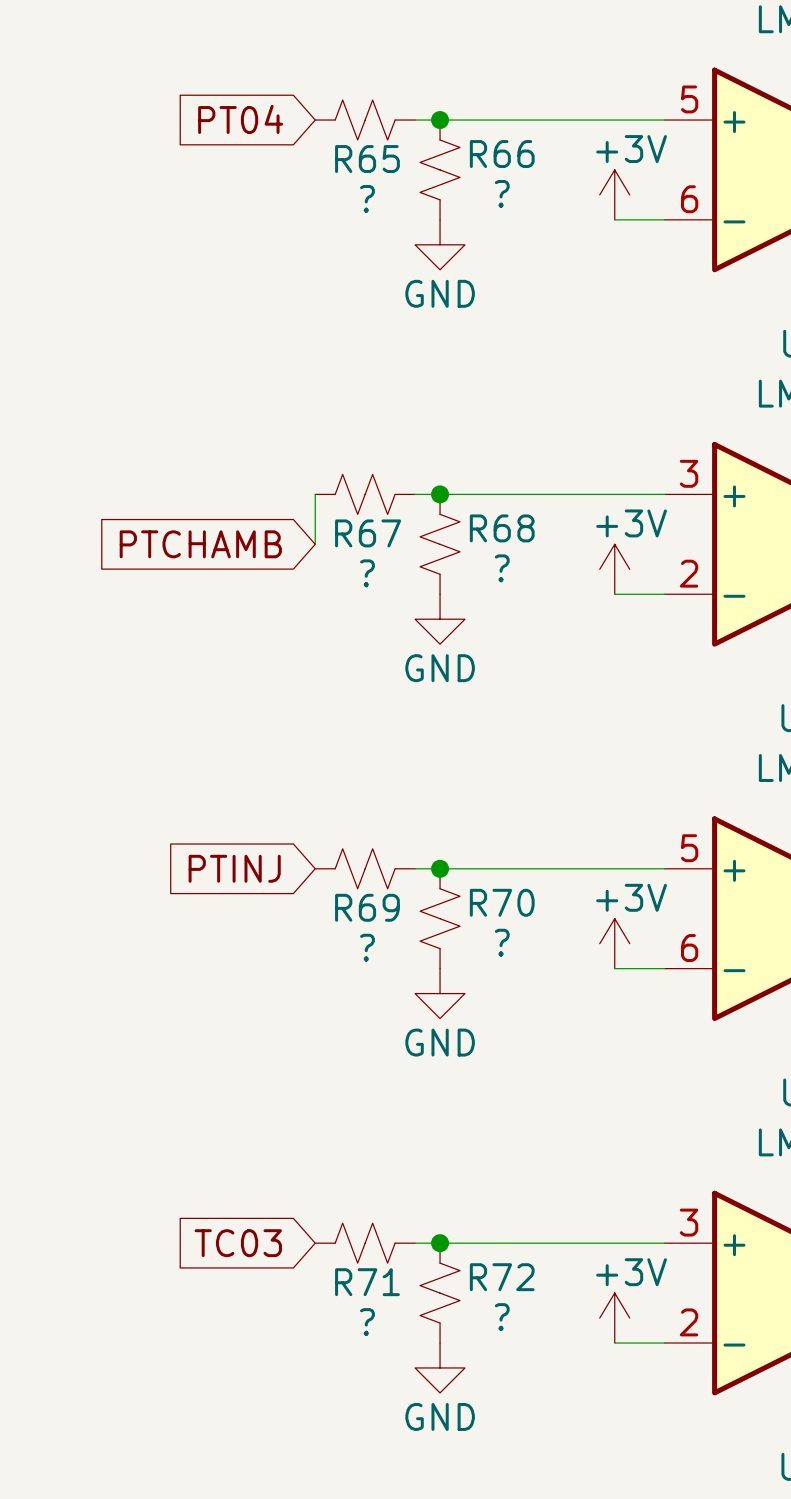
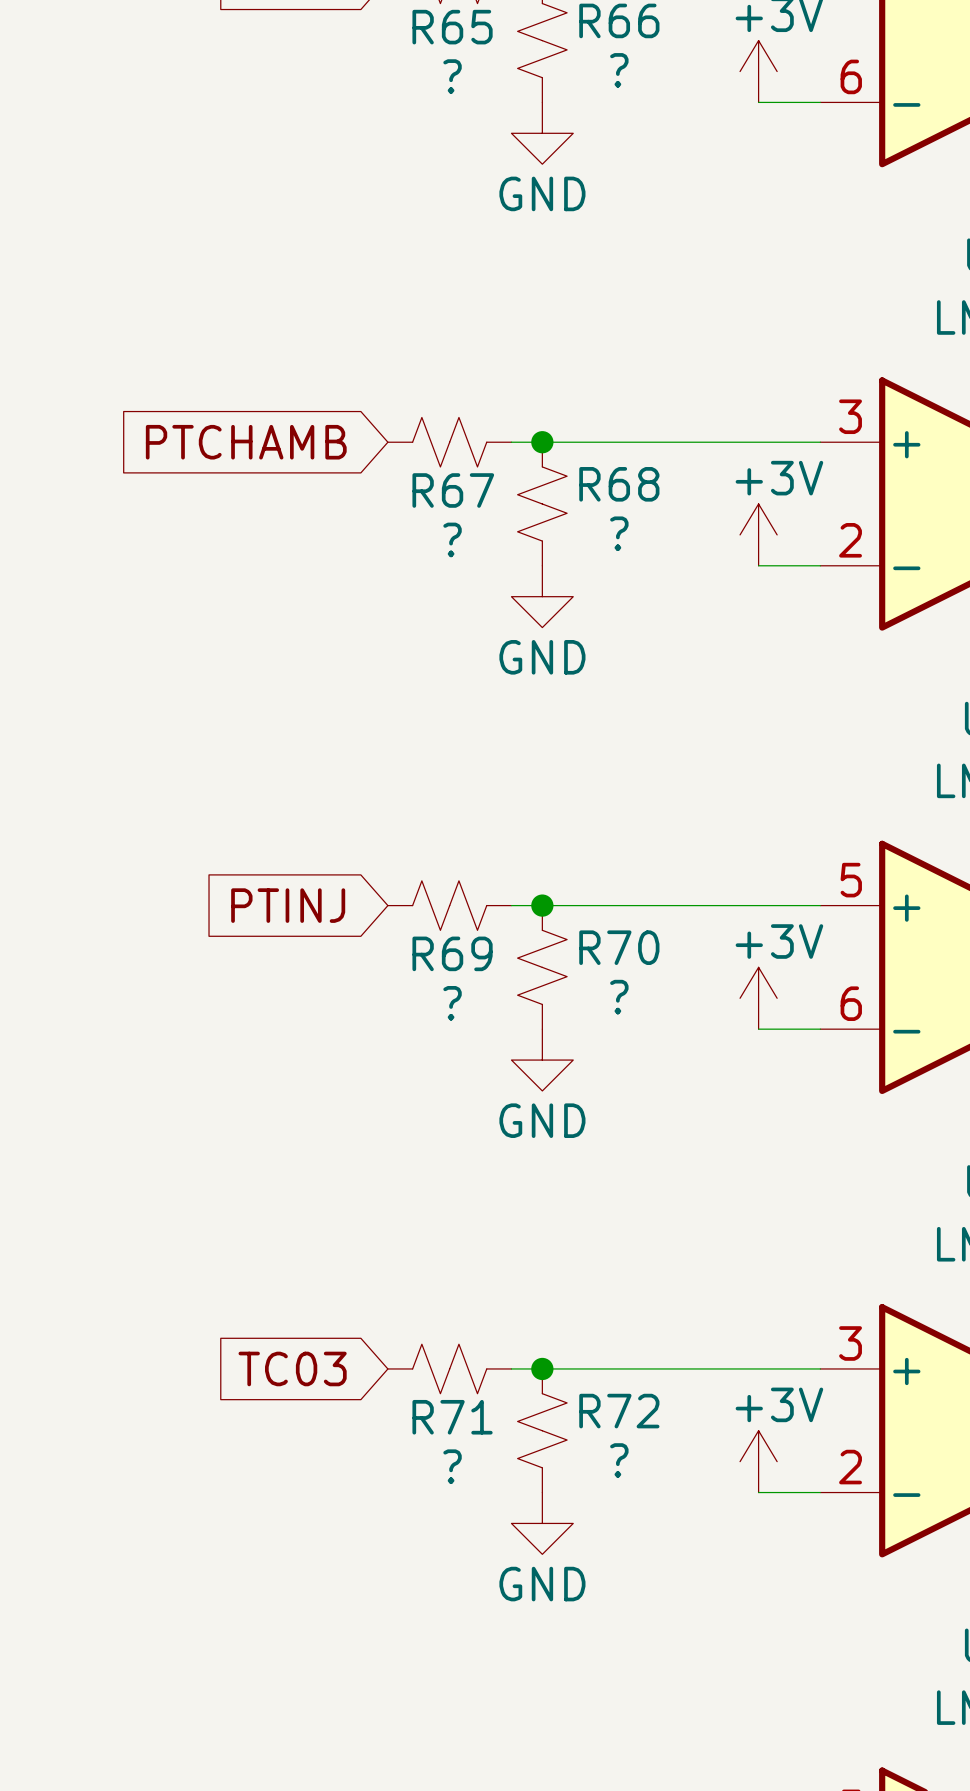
wire: (315, 494) (315, 544) -> none
global label position: PTCHAMB (200, 544) -> PTCHAMB (246, 442)

